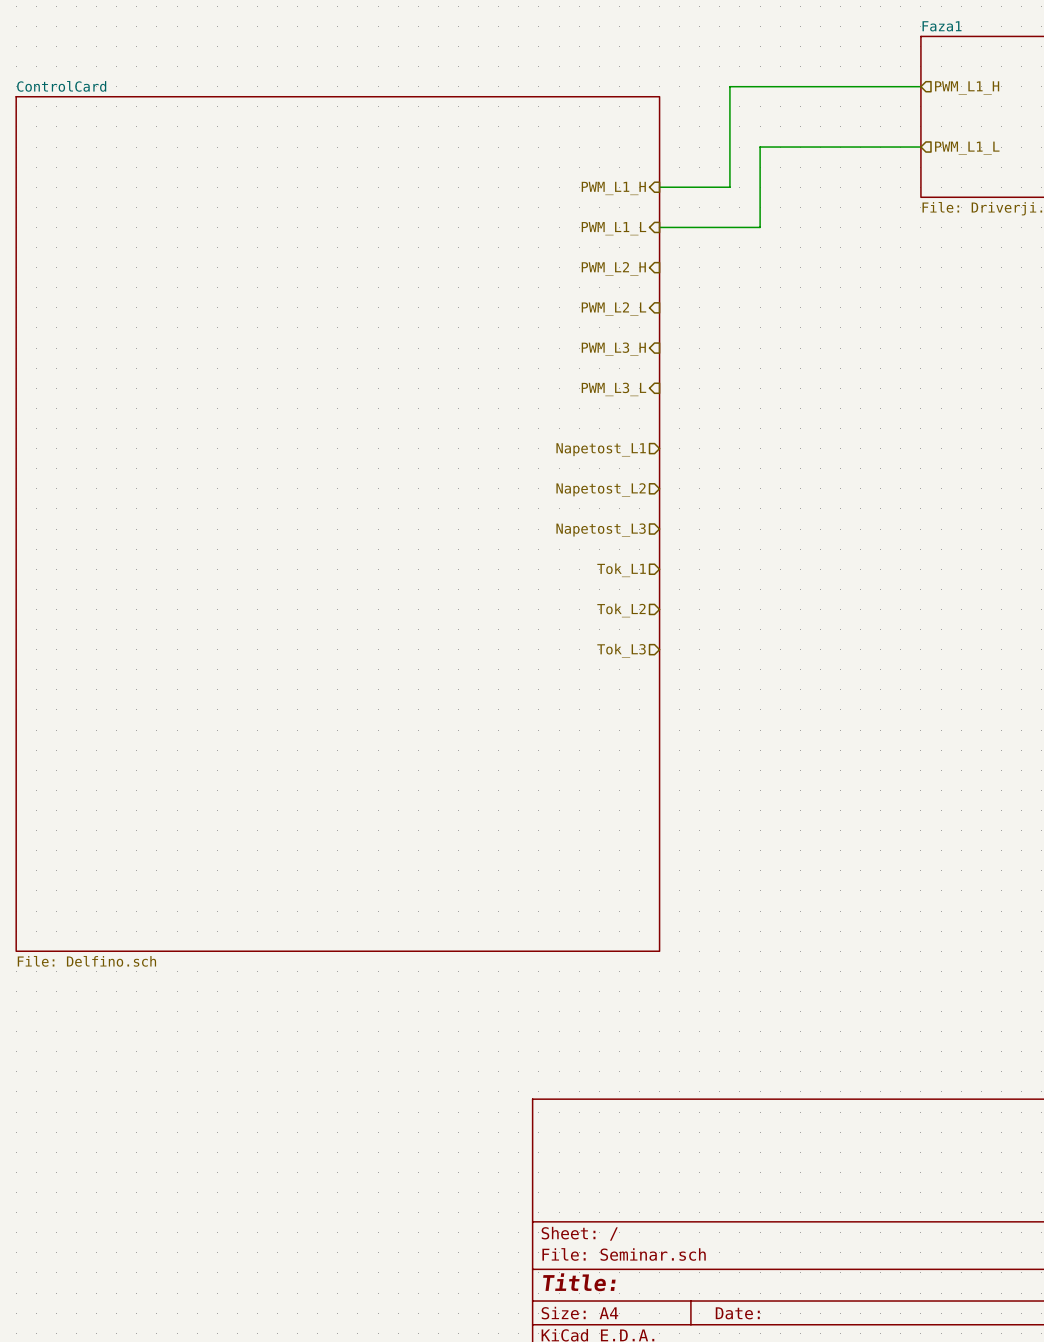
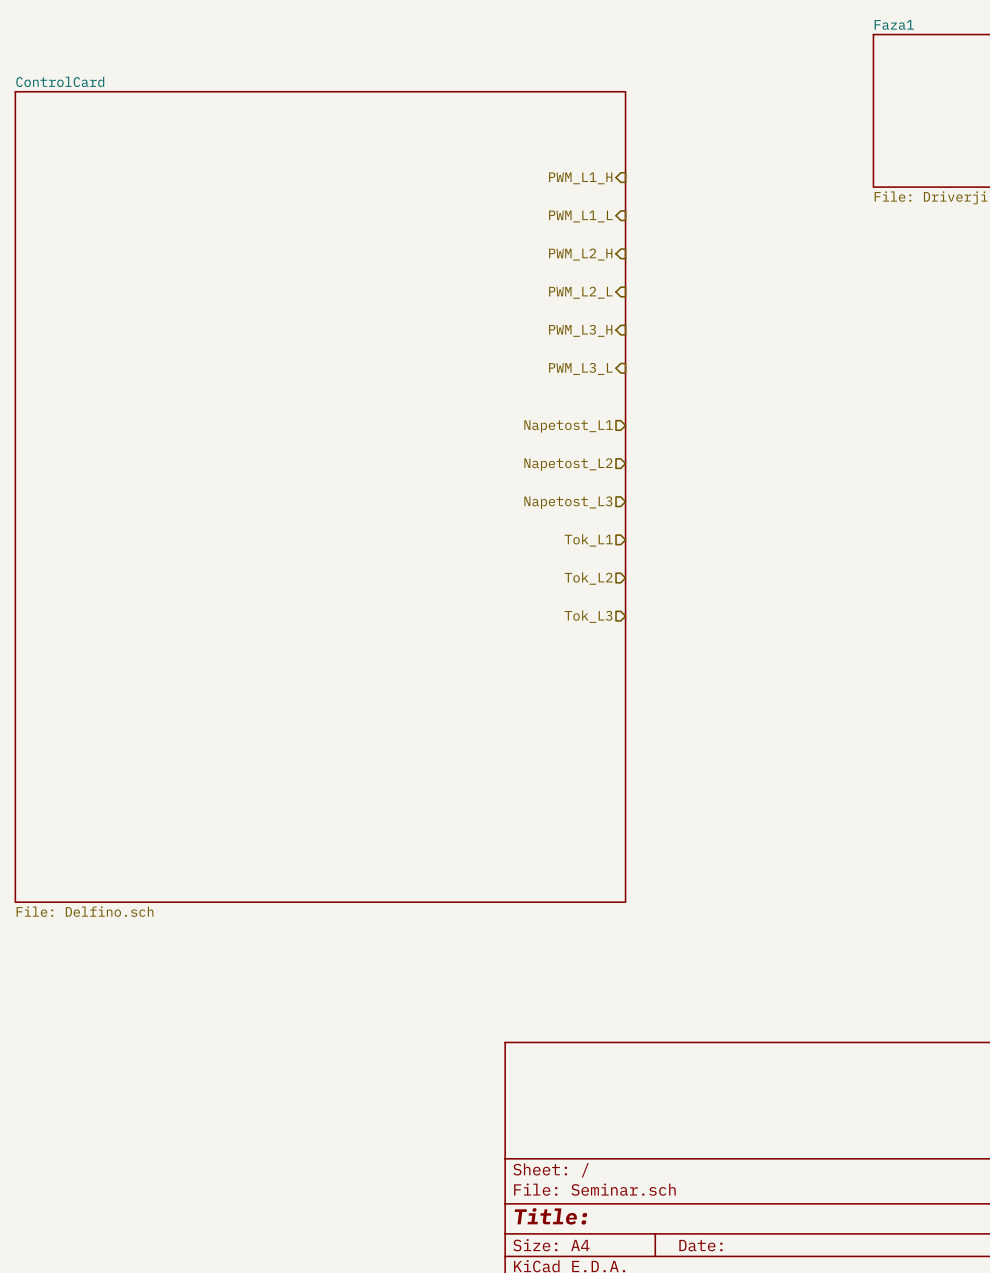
wire: (920, 86) (729, 86) (729, 187) (659, 187) -> none
hierarchical label: PWM_L1_H (967, 87) -> none
wire: (920, 147) (760, 147) (760, 227) (659, 227) -> none
hierarchical label: PWM_L1_L (967, 148) -> none

